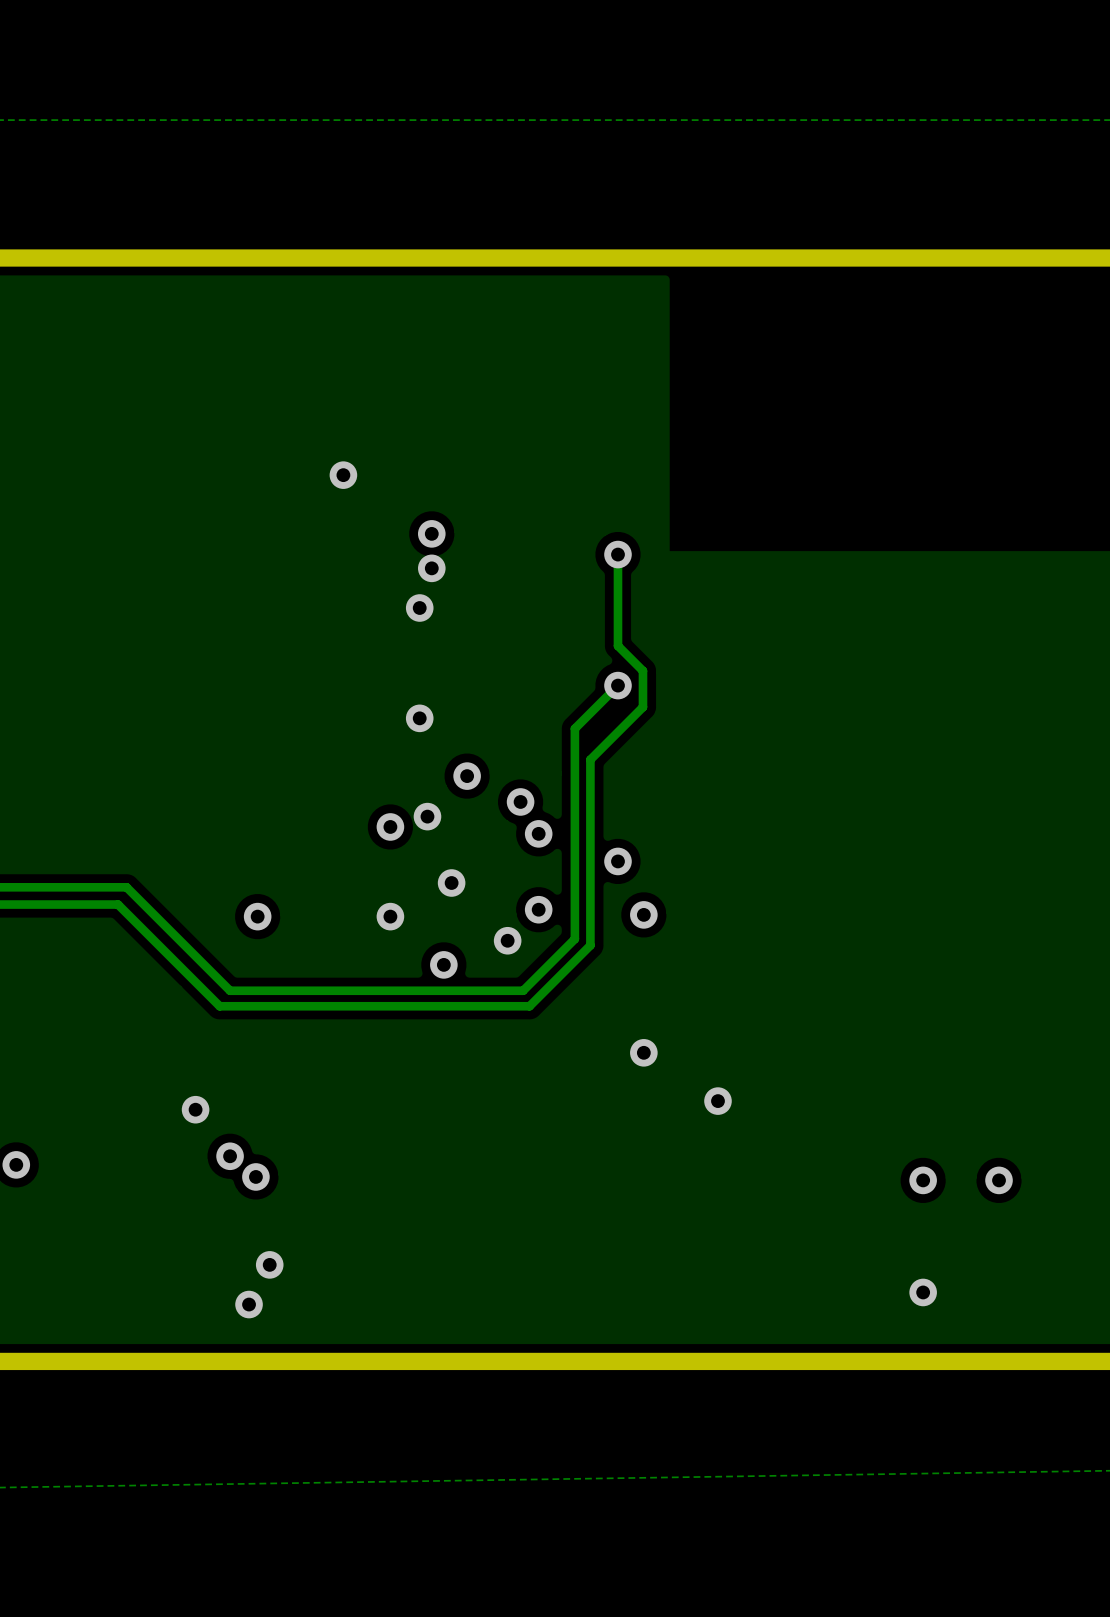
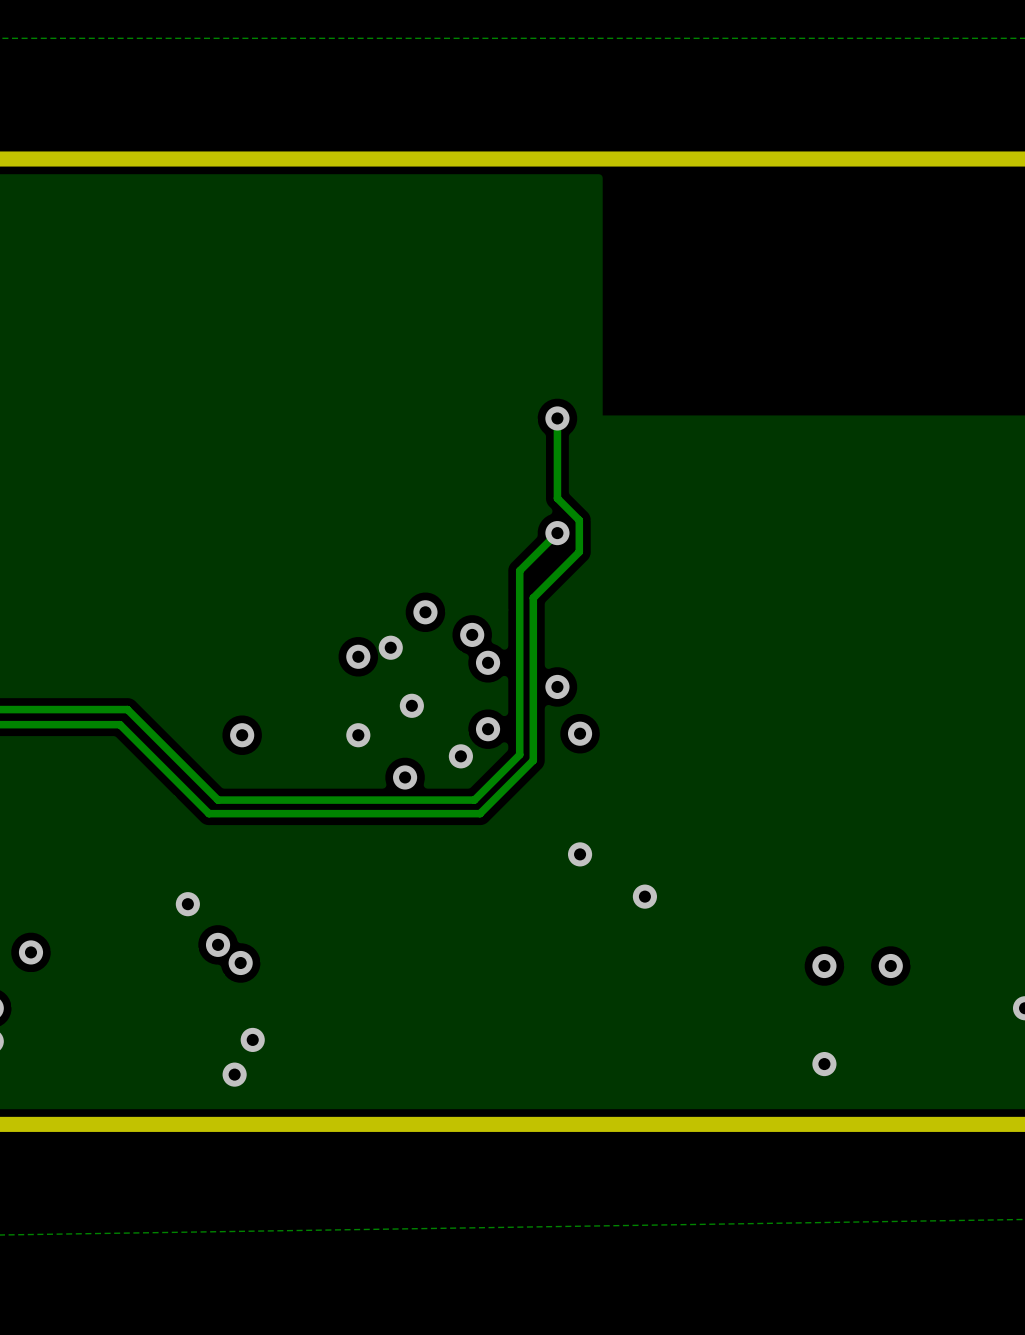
via: (343, 475) -> none
via: (431, 533) -> none
via: (431, 568) -> none
via: (419, 608) -> none
via: (419, 718) -> none

